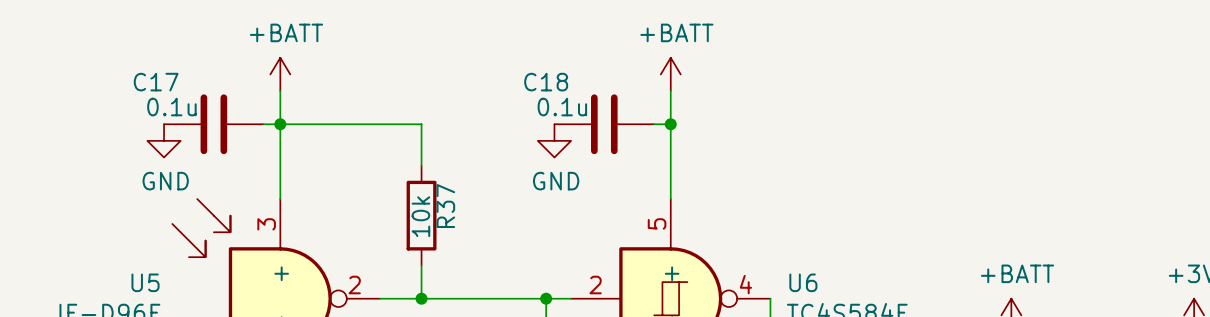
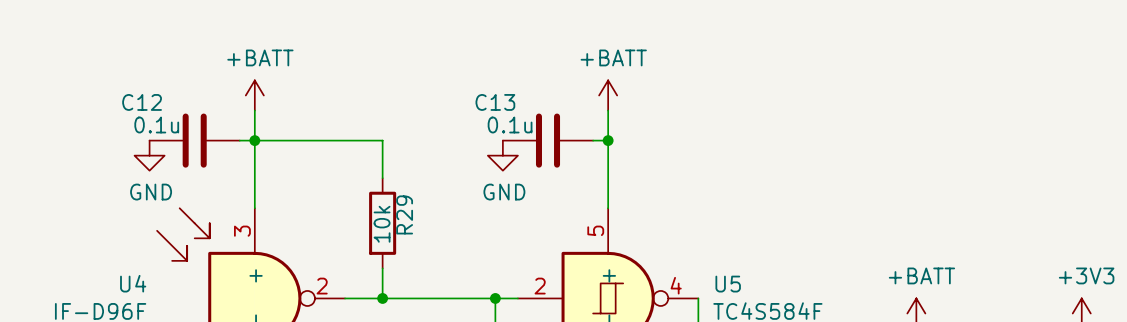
C17 name: C17 (156, 82) -> C12 (142, 102)
C18 name: C18 (546, 82) -> C13 (495, 102)
R37 name: R37 (445, 206) -> R29 (404, 214)
U5 name: U5 (145, 282) -> U4 (133, 283)
U6 name: U6 (803, 282) -> U5 (728, 284)

